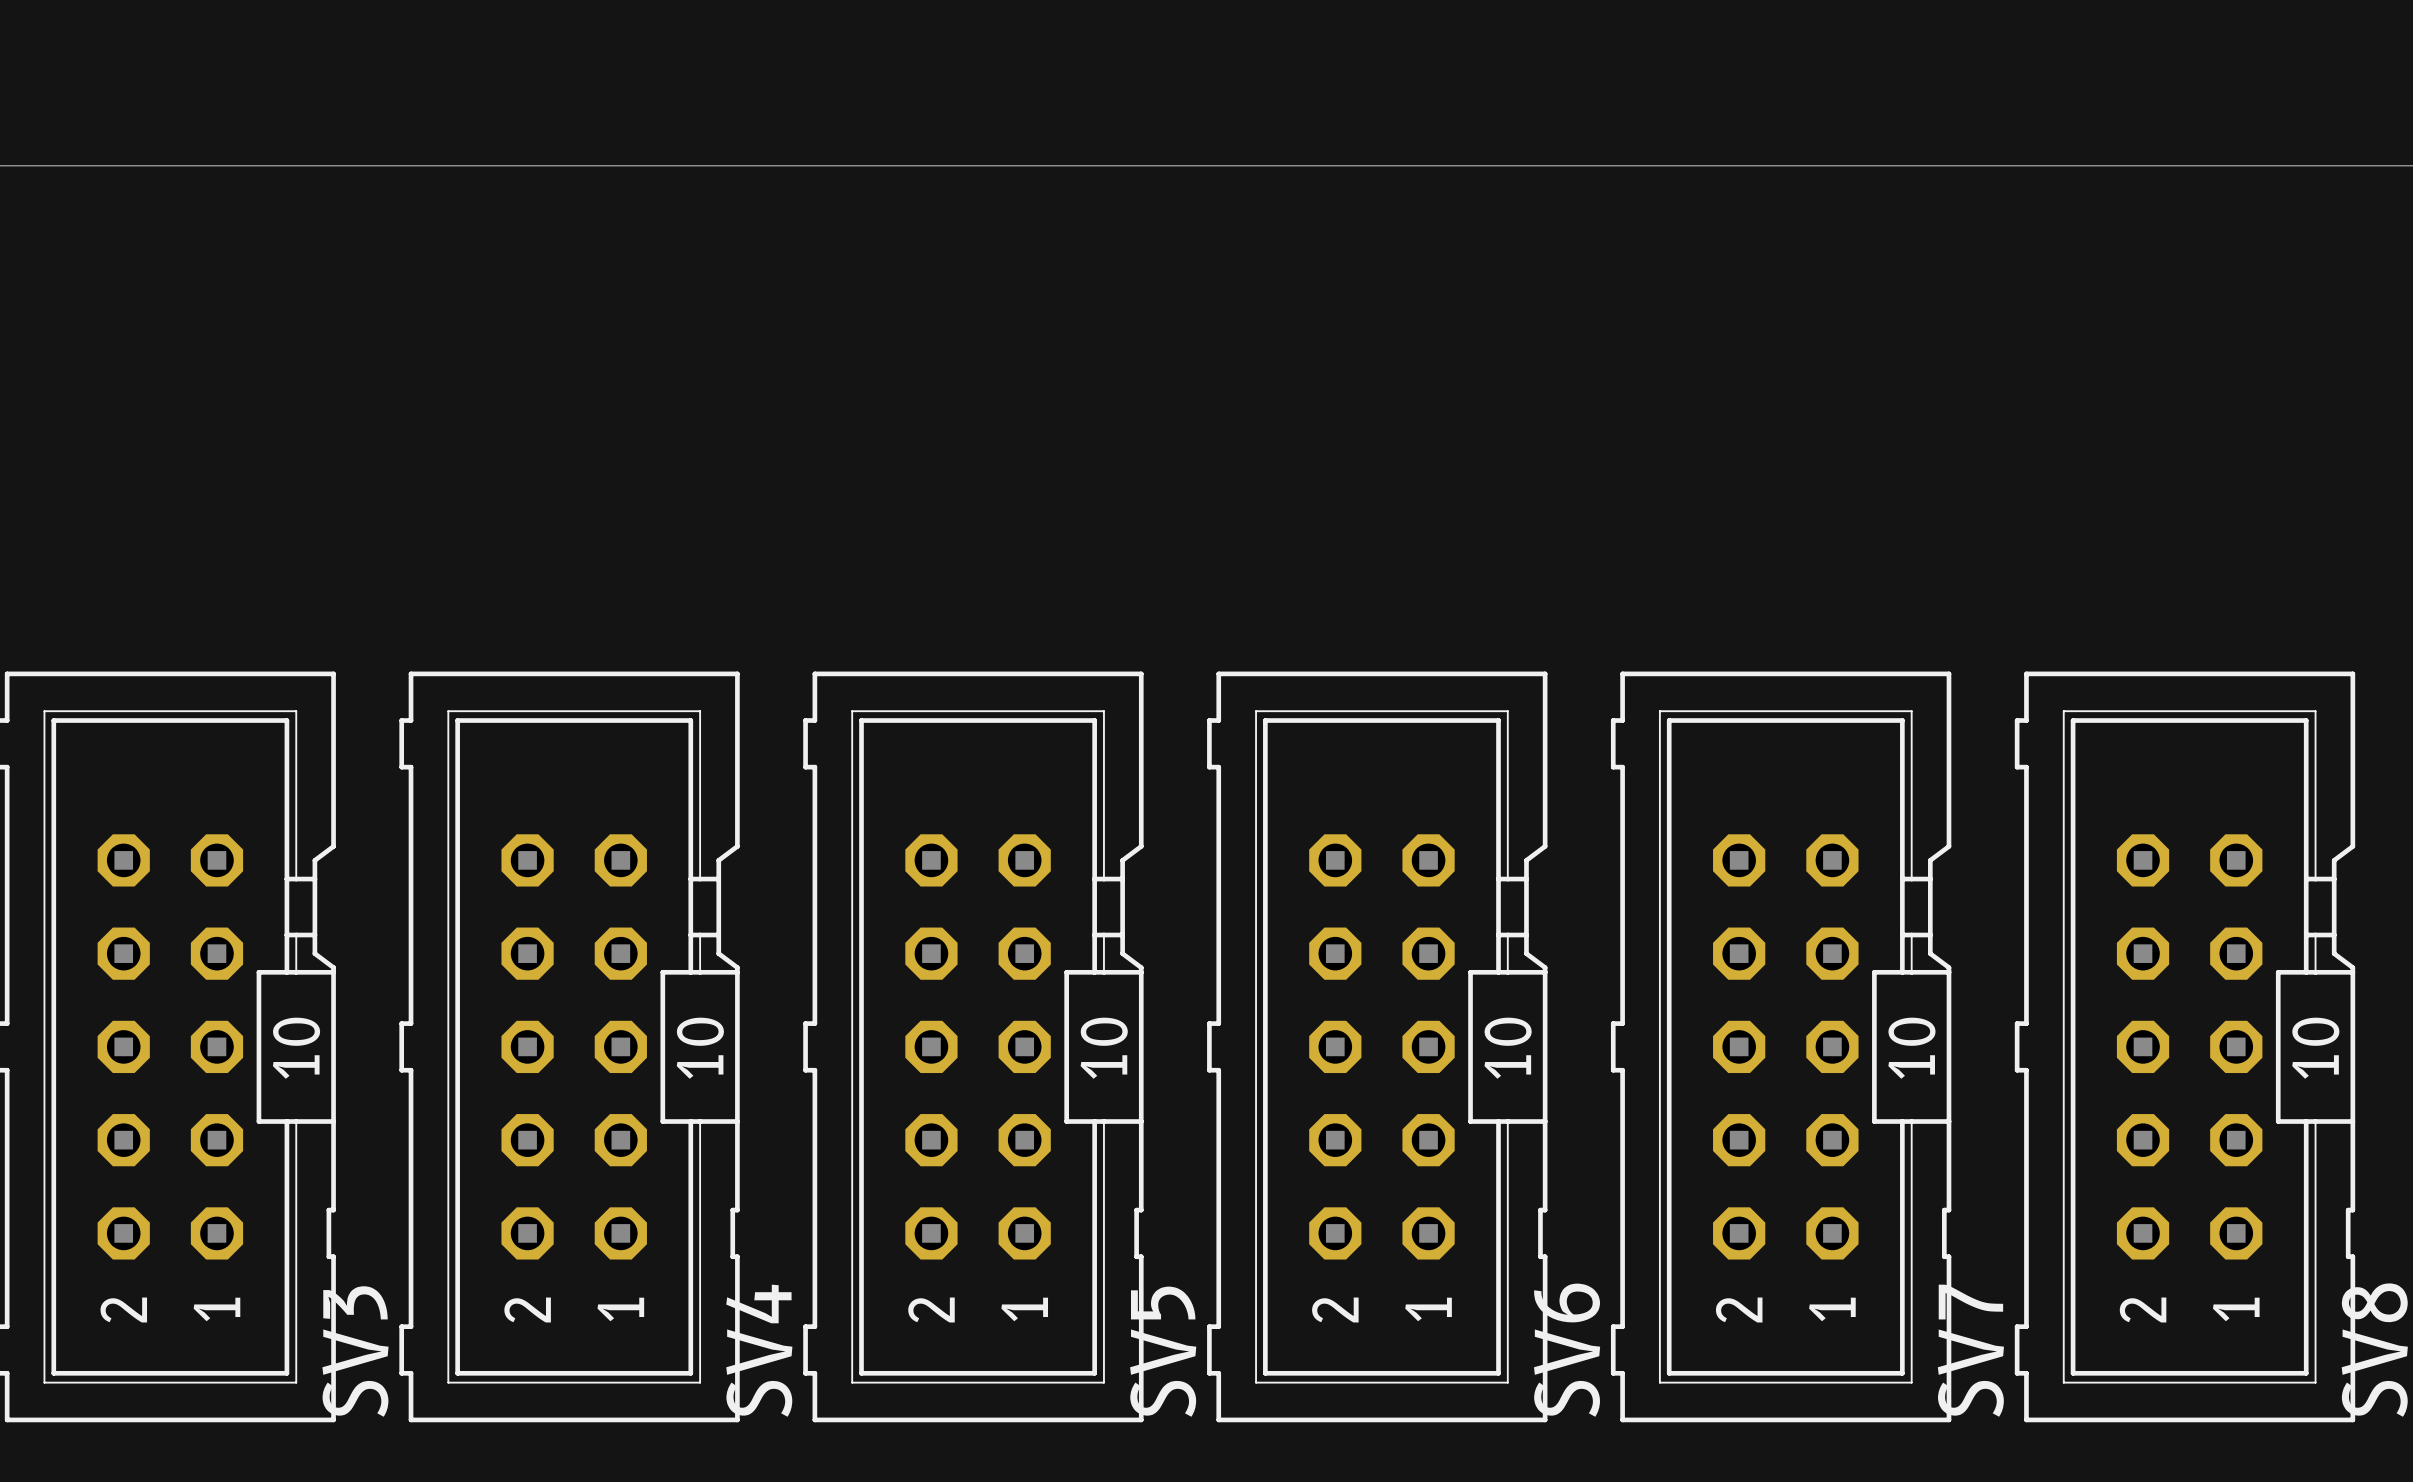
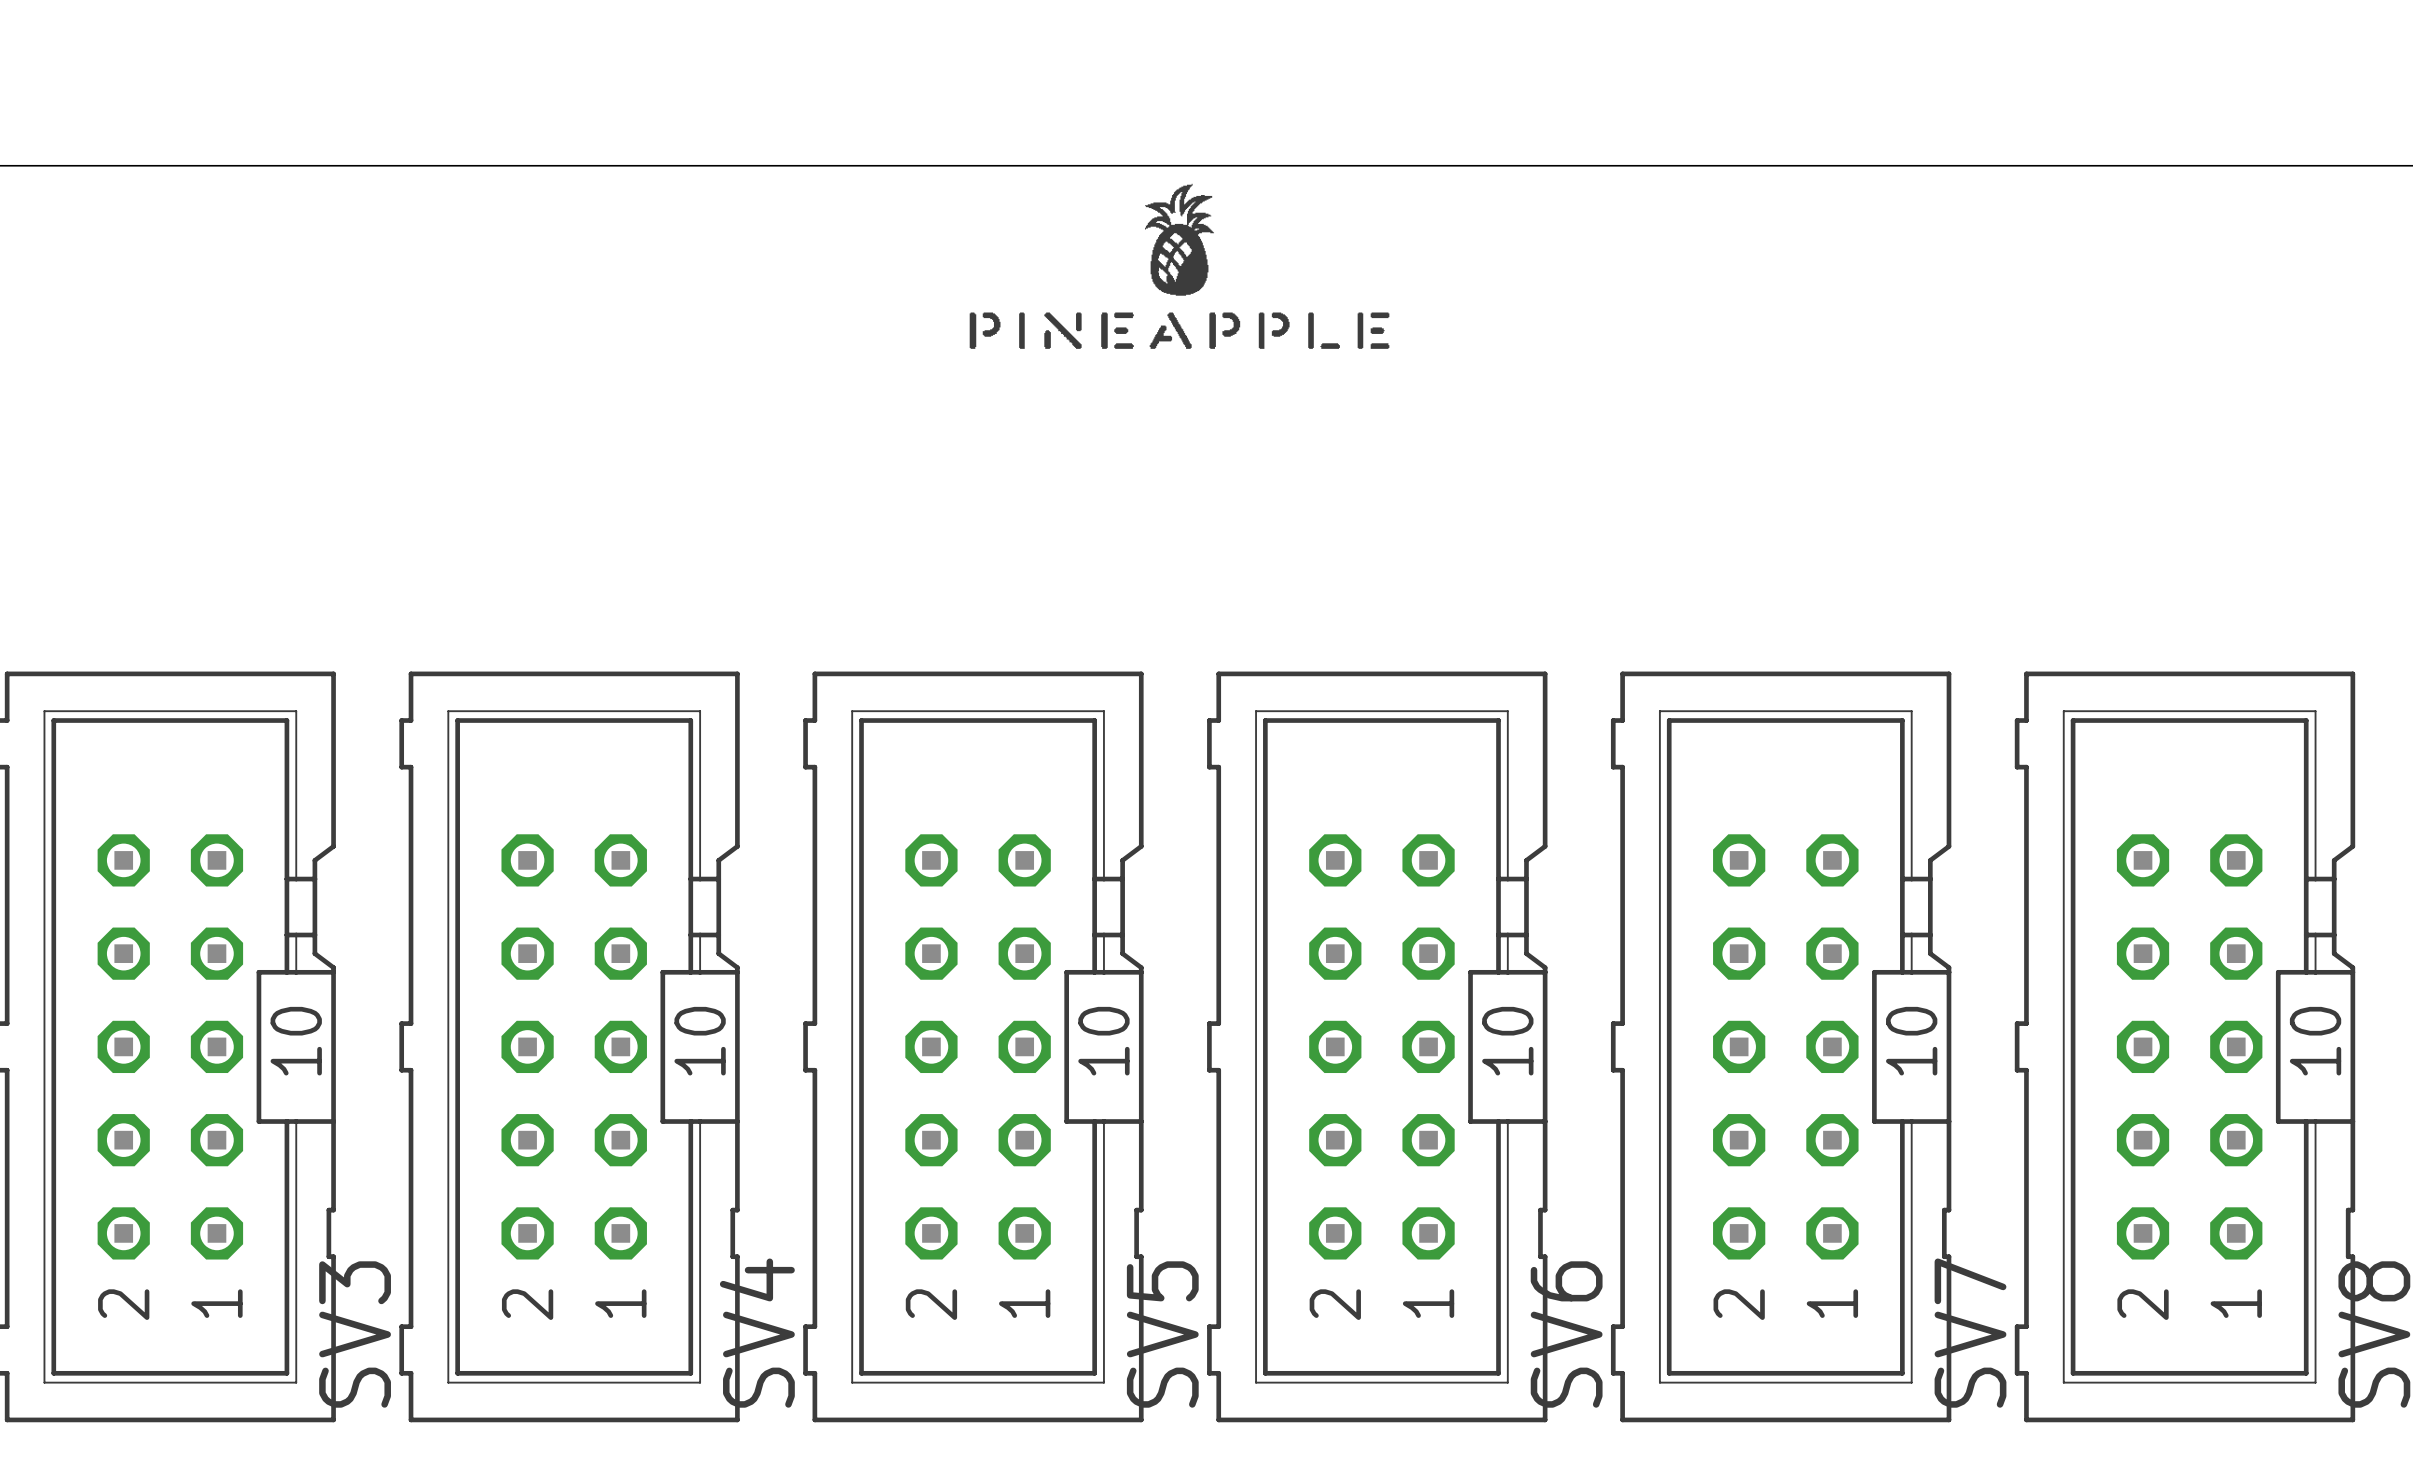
drawing: none -> [969, 183, 1390, 349]

